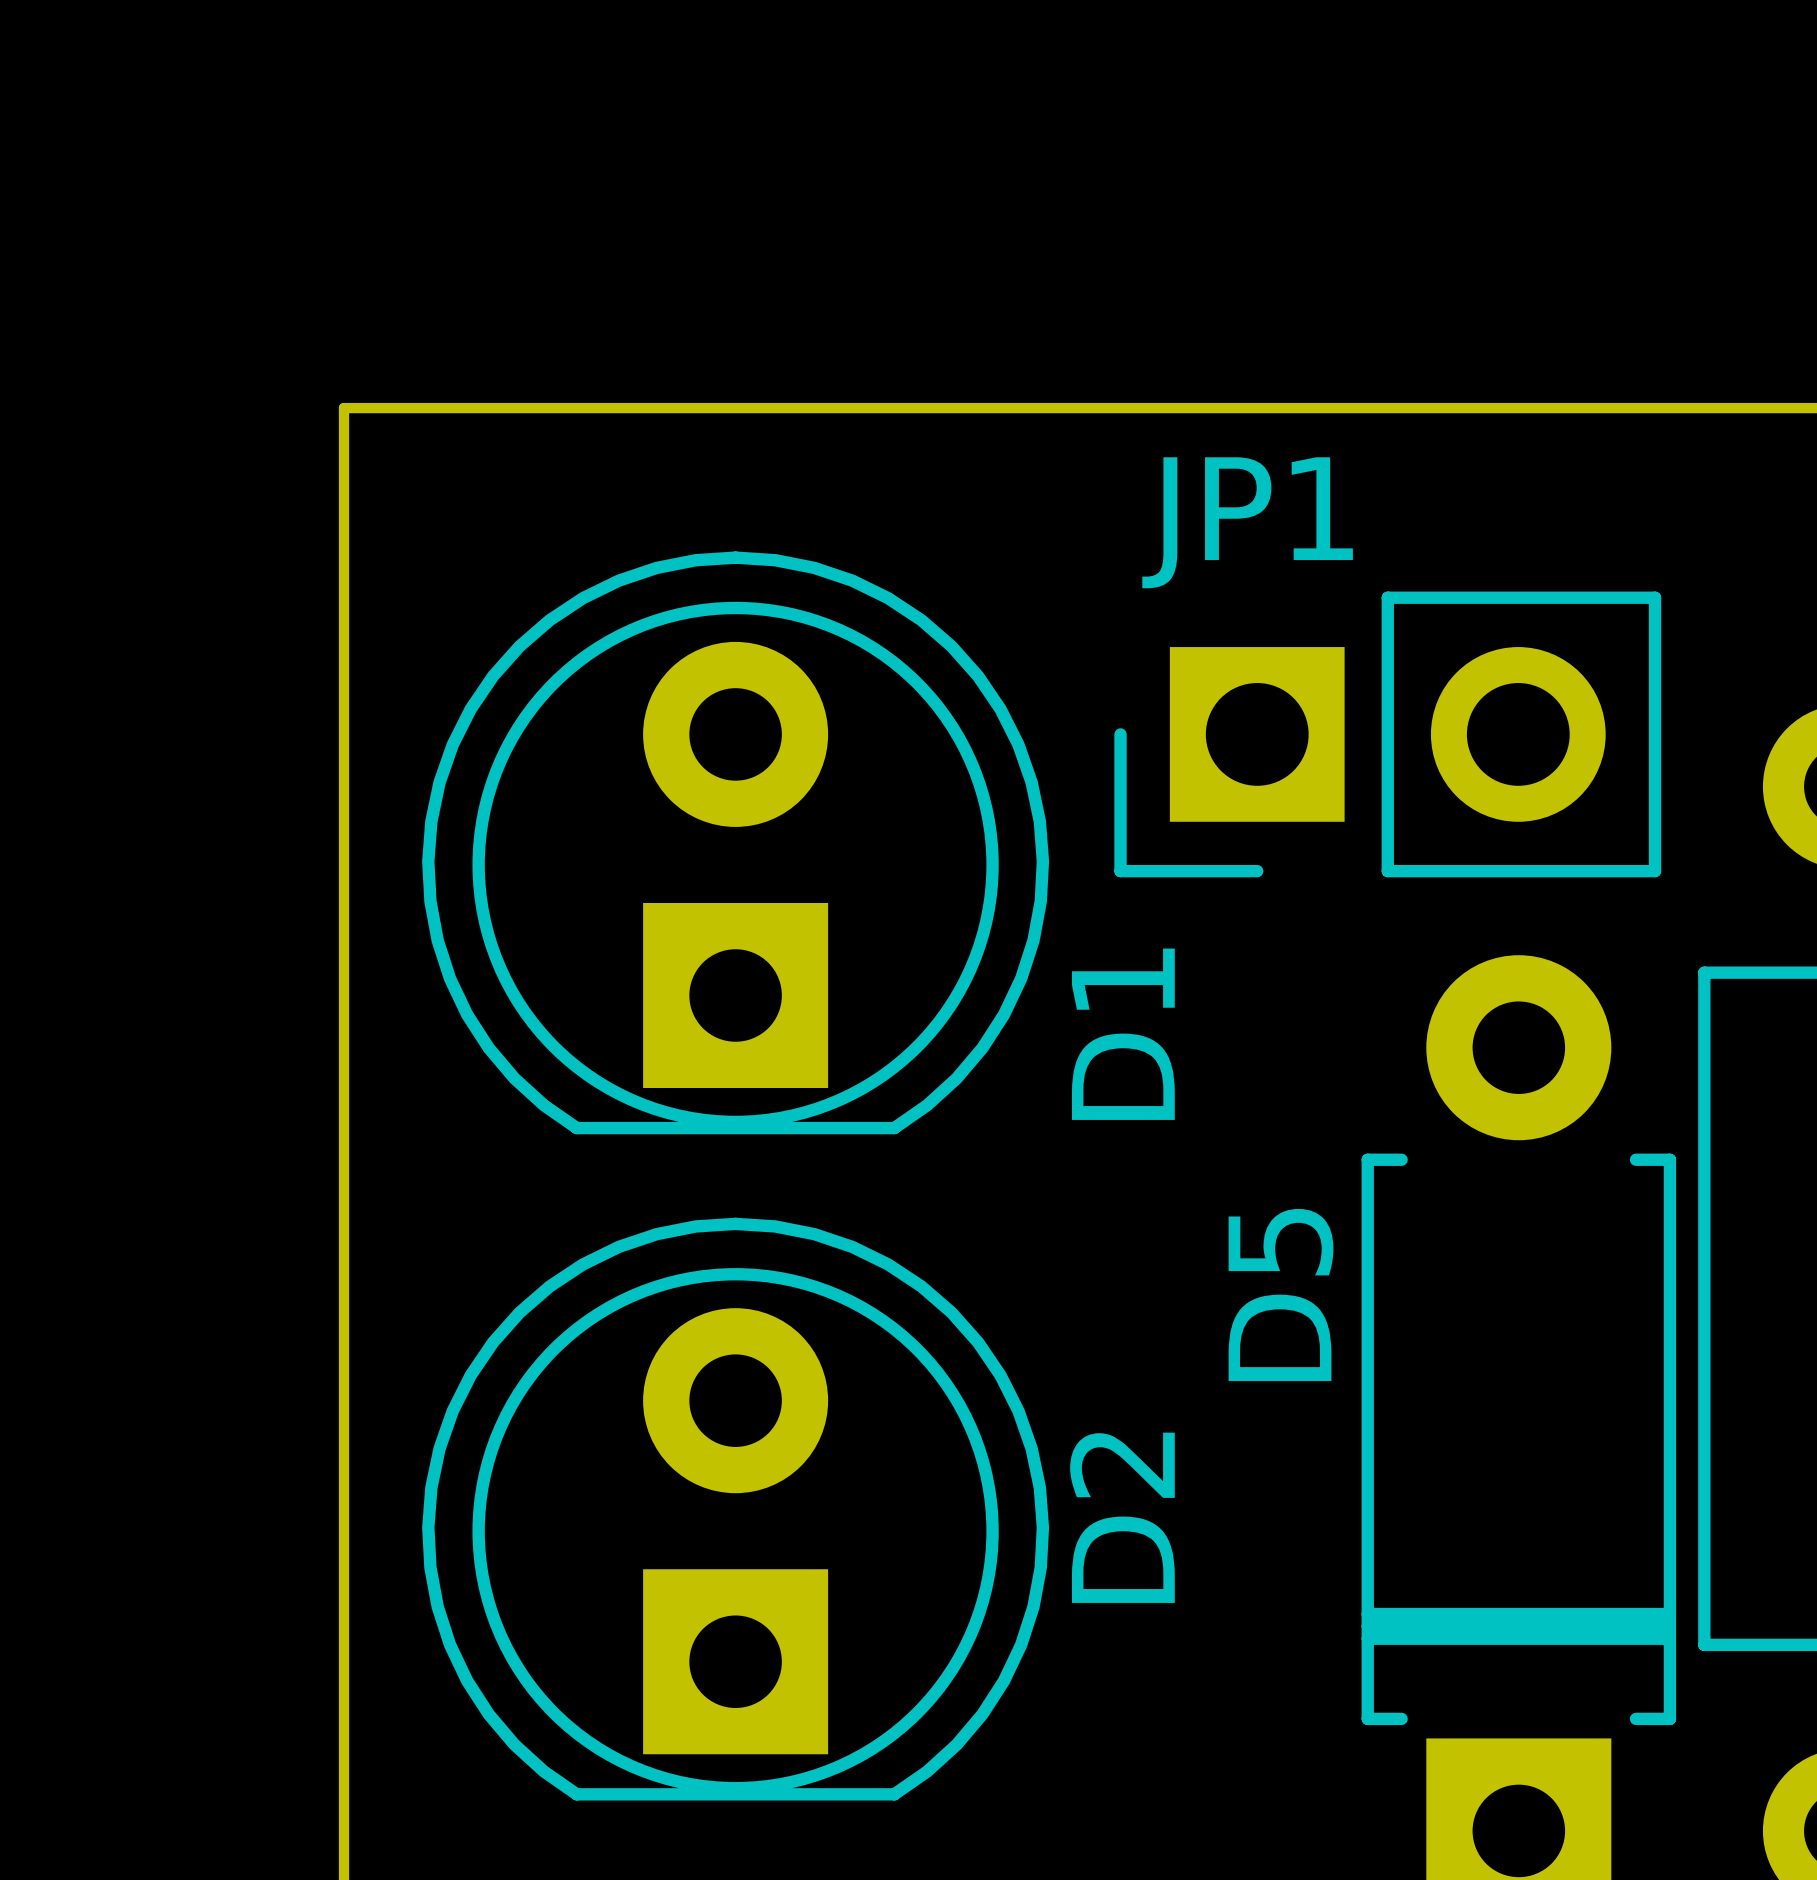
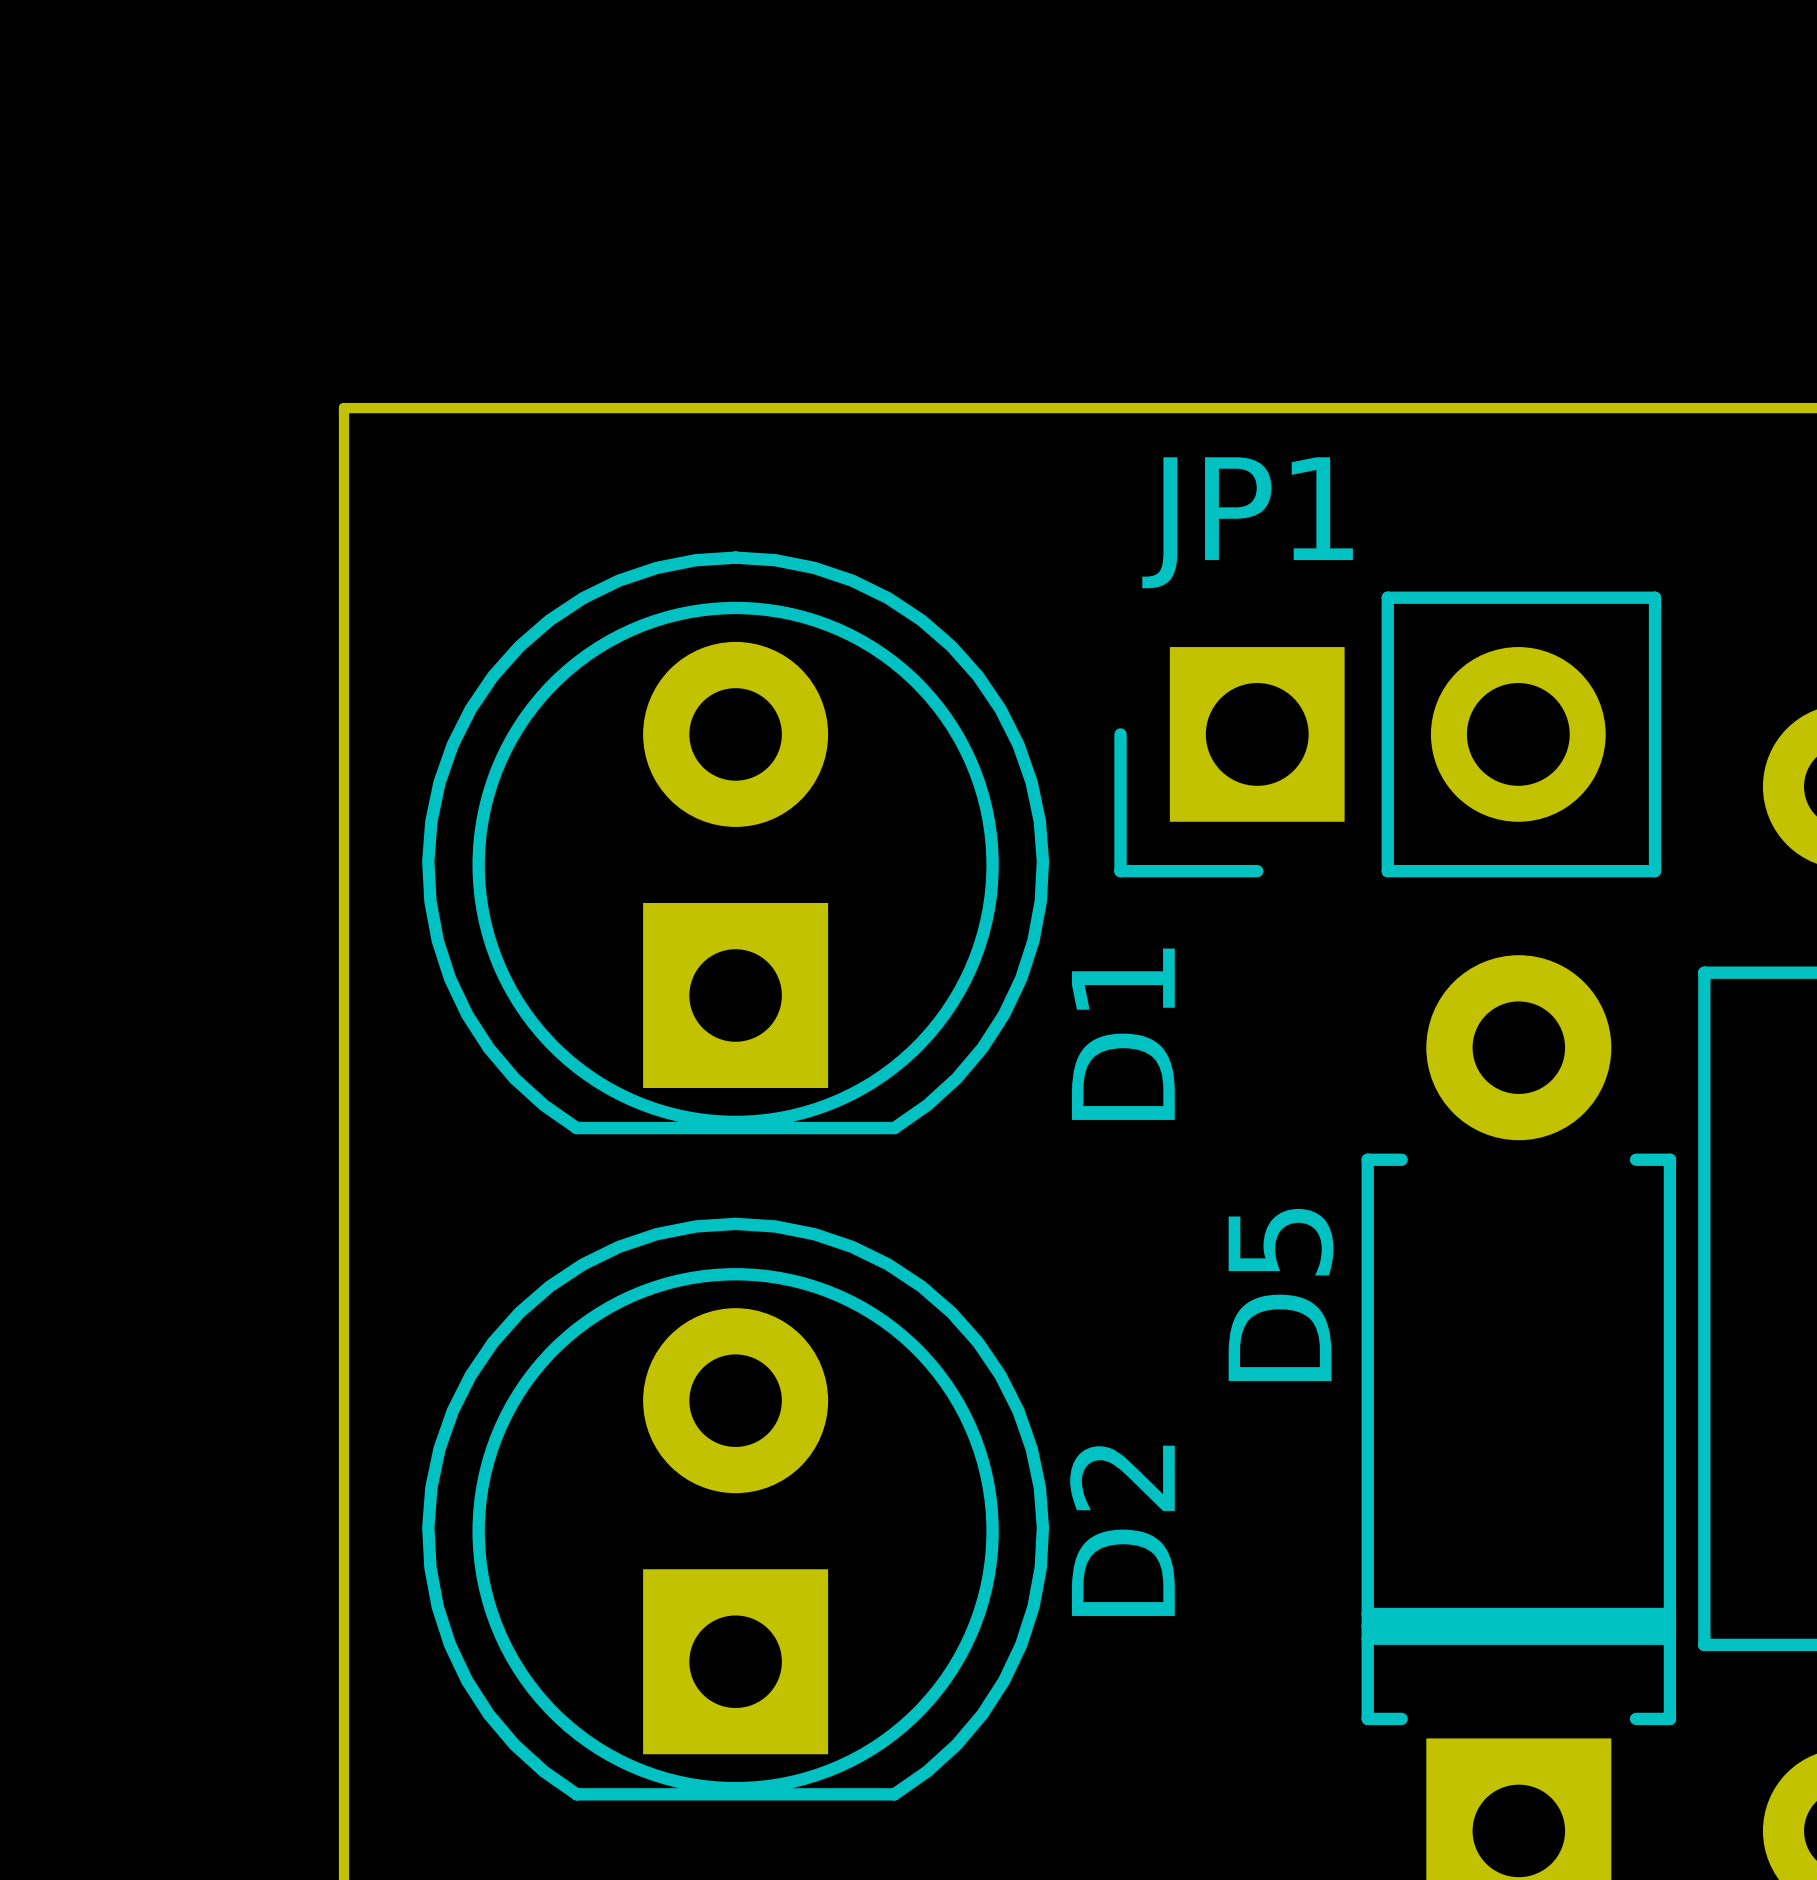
D2 name position: D2 (1122, 1517) -> D2 (1122, 1530)

